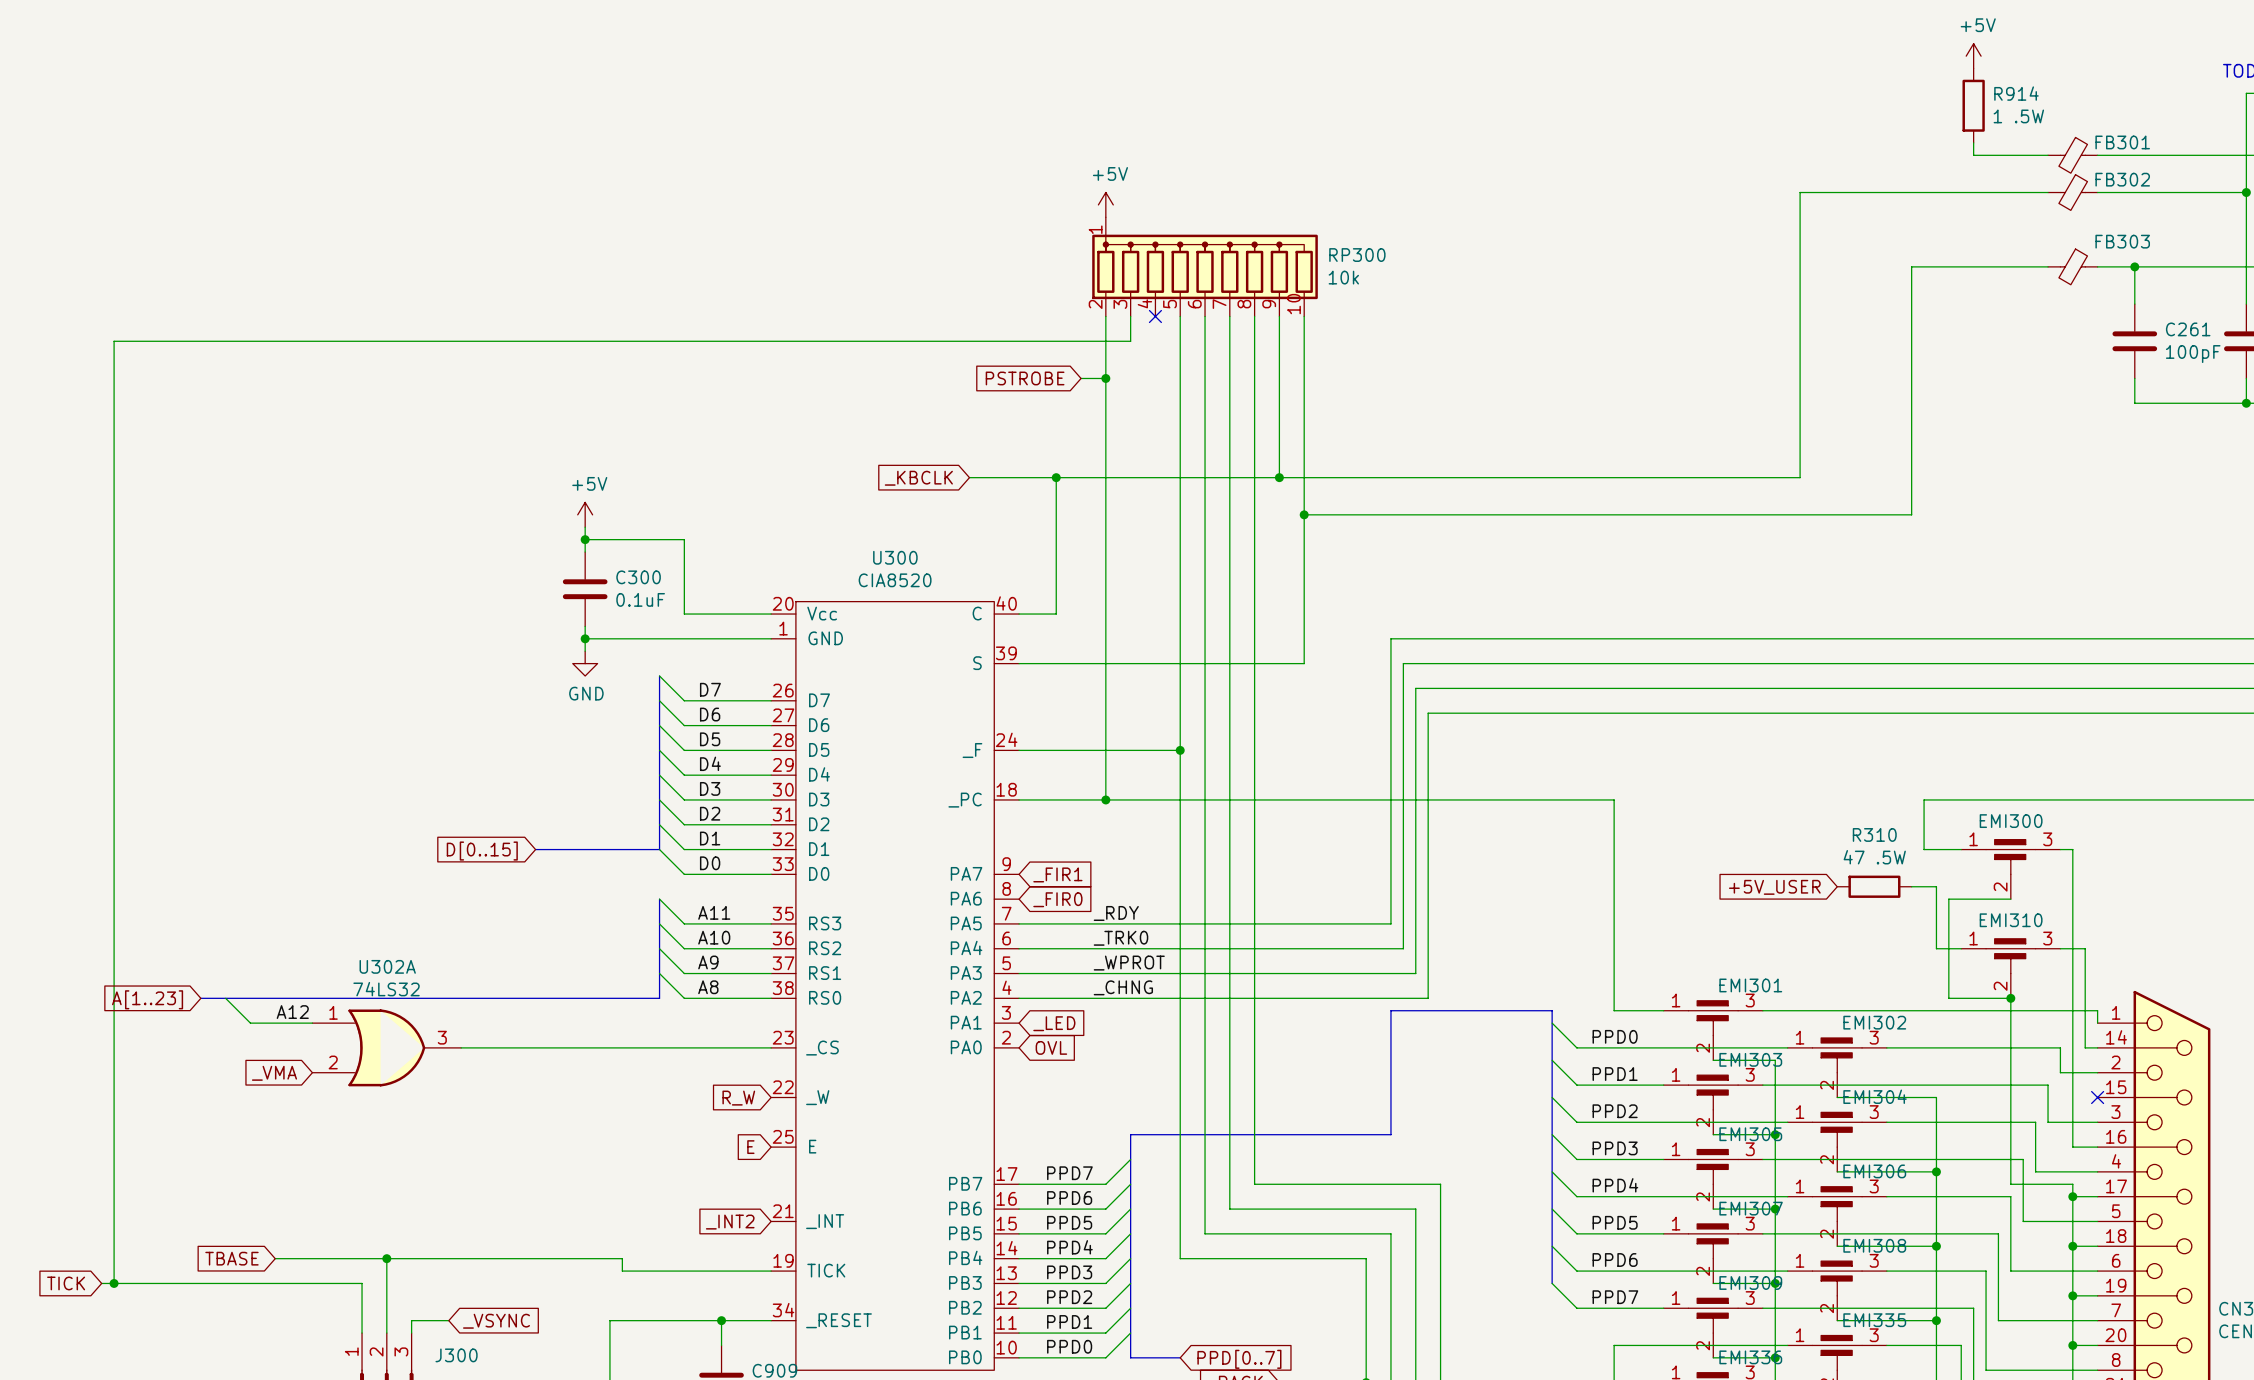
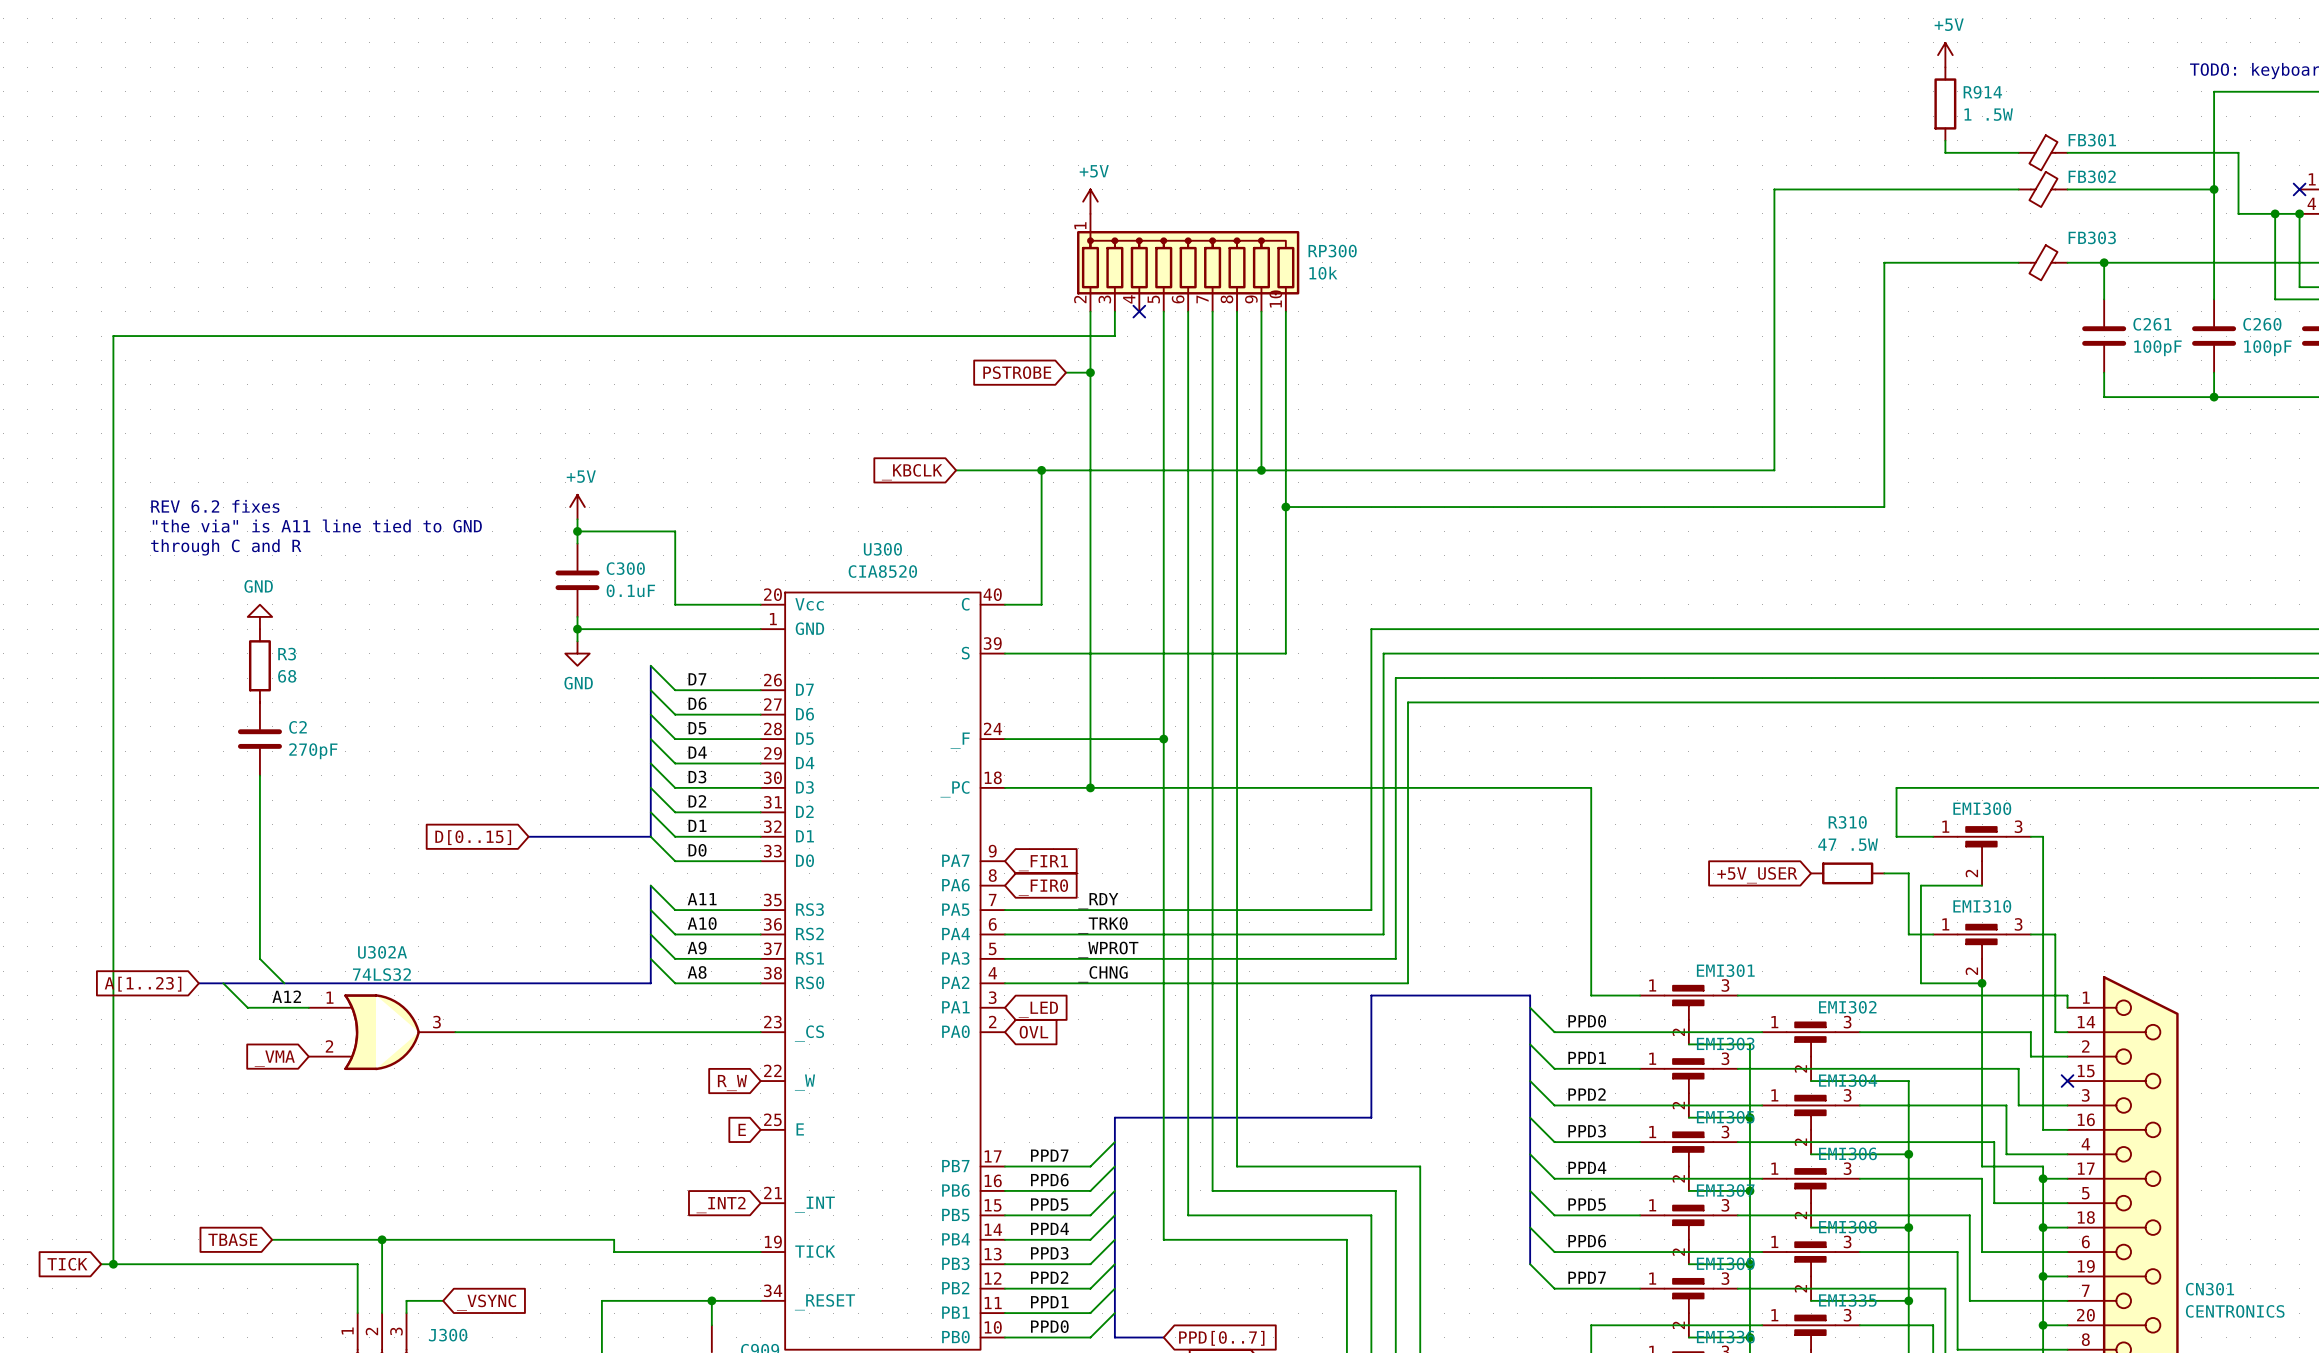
text: none -> REV 6.2 fixes (215, 506)
text: none -> "the via" is A11 line tied to GND (317, 526)
text: none -> through C and R (226, 547)
power symbol: none -> GND (259, 616)
R3: none -> 68 (259, 665)
C2: none -> 270pF (259, 739)
wire: none -> (259, 775) (259, 958) (284, 983)

